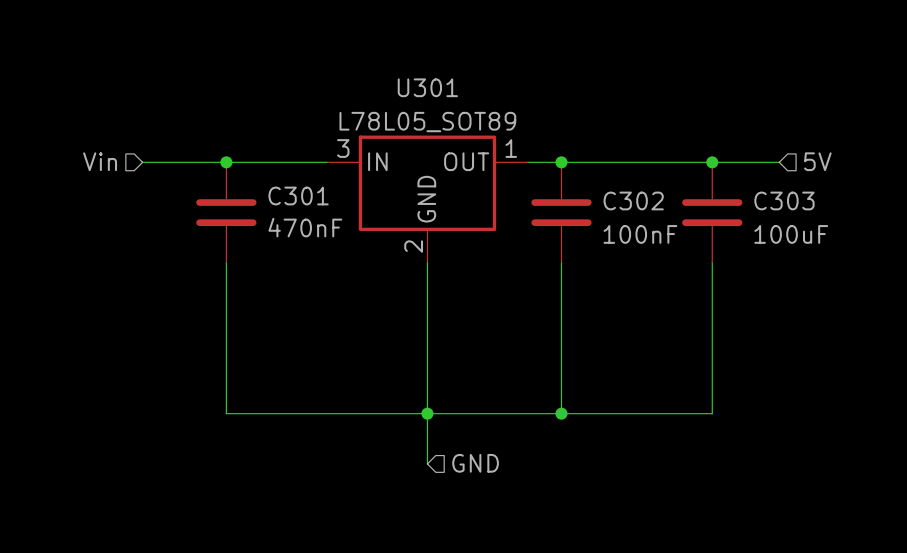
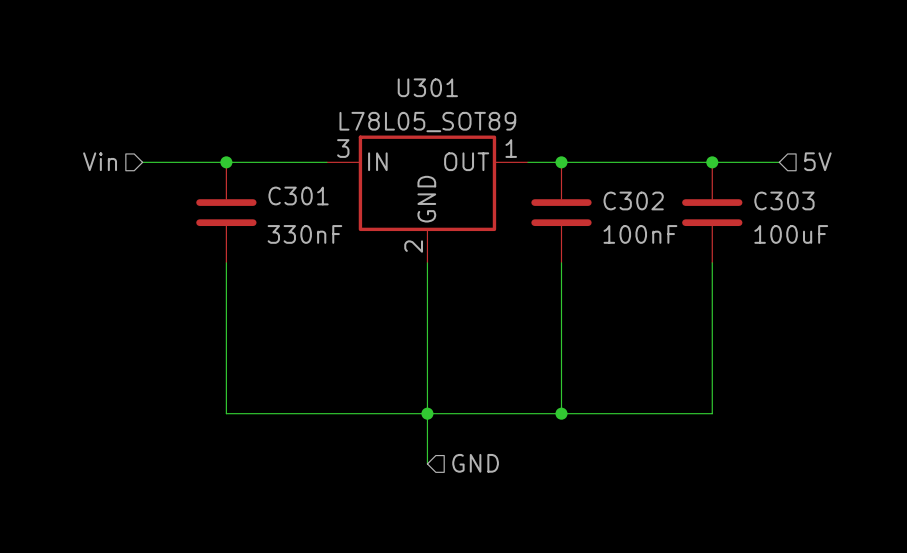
C301 value: 470nF (305, 227) -> 330nF (304, 234)

